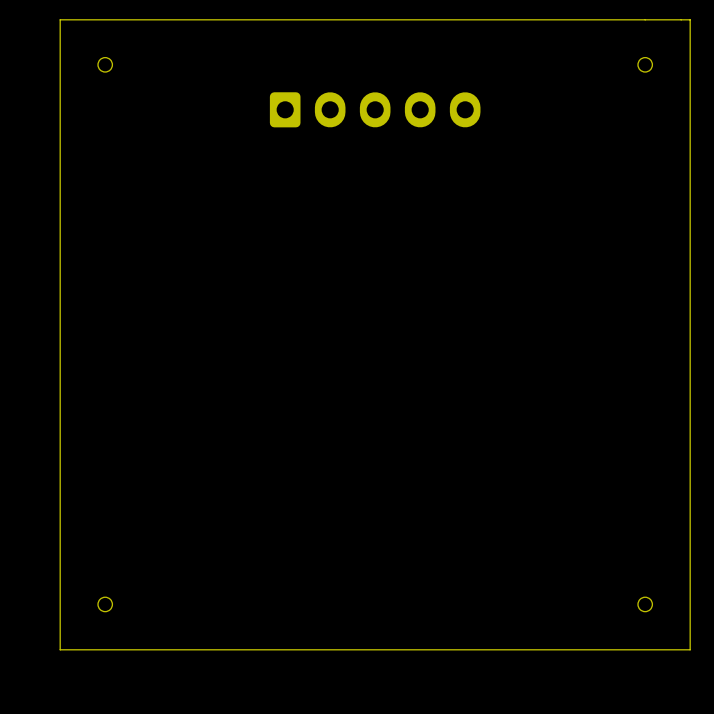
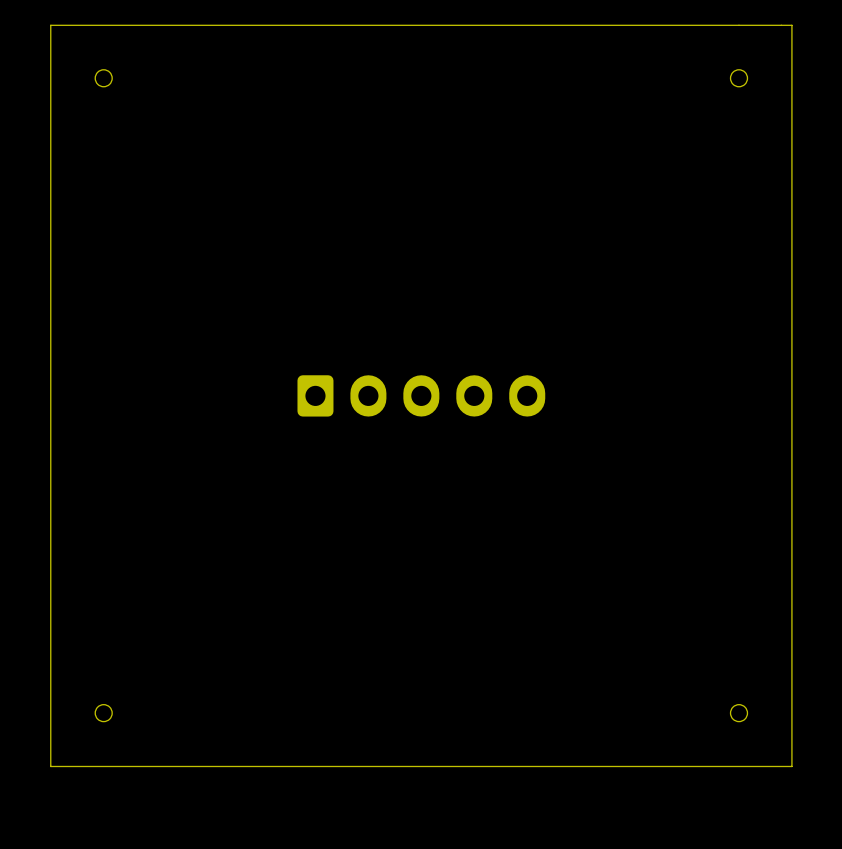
part position: (375, 109) -> (421, 395)

